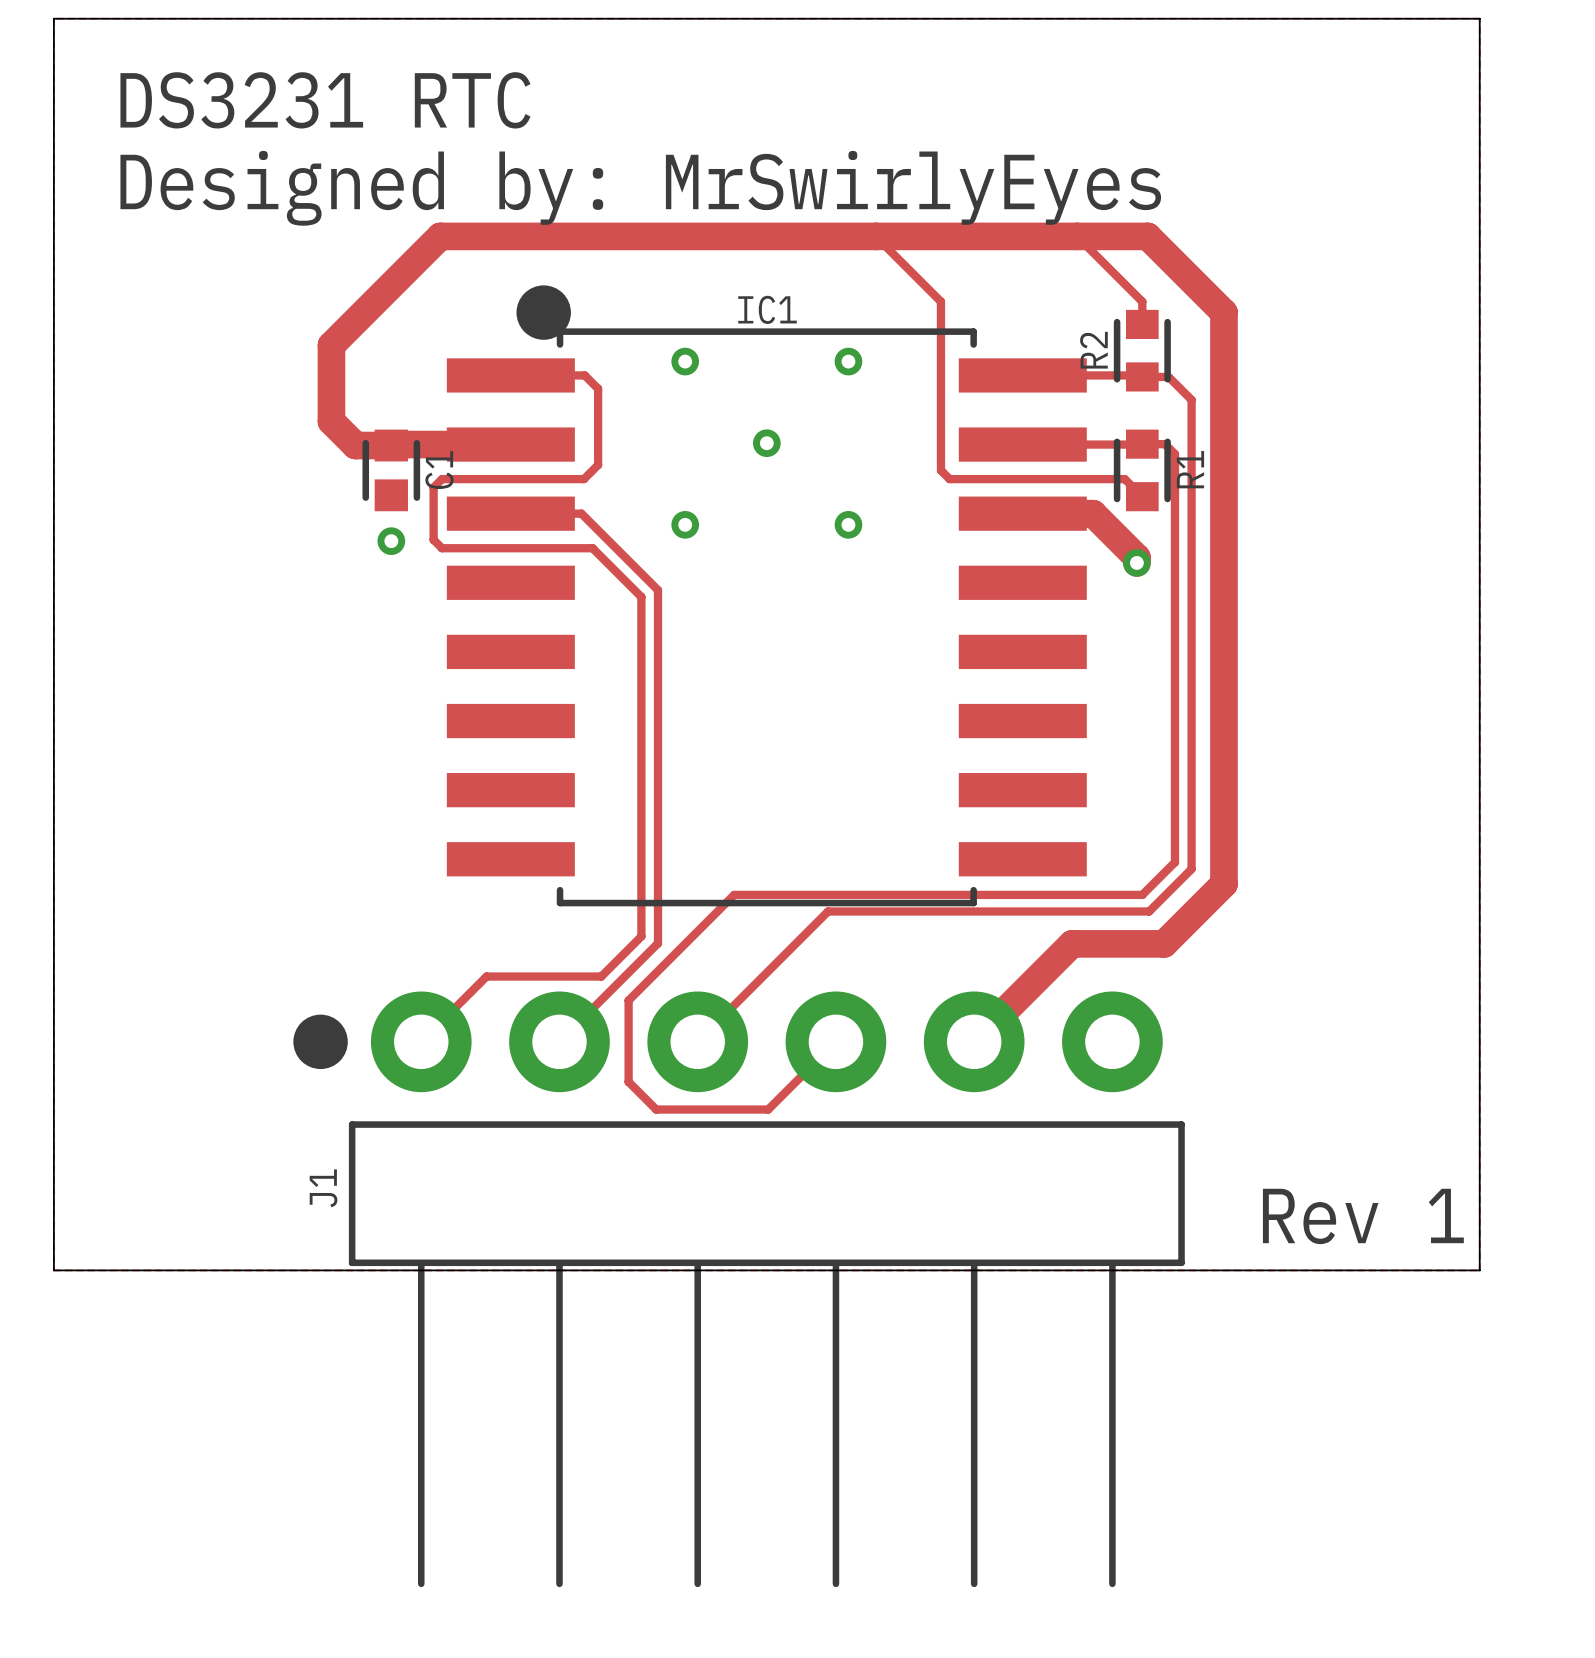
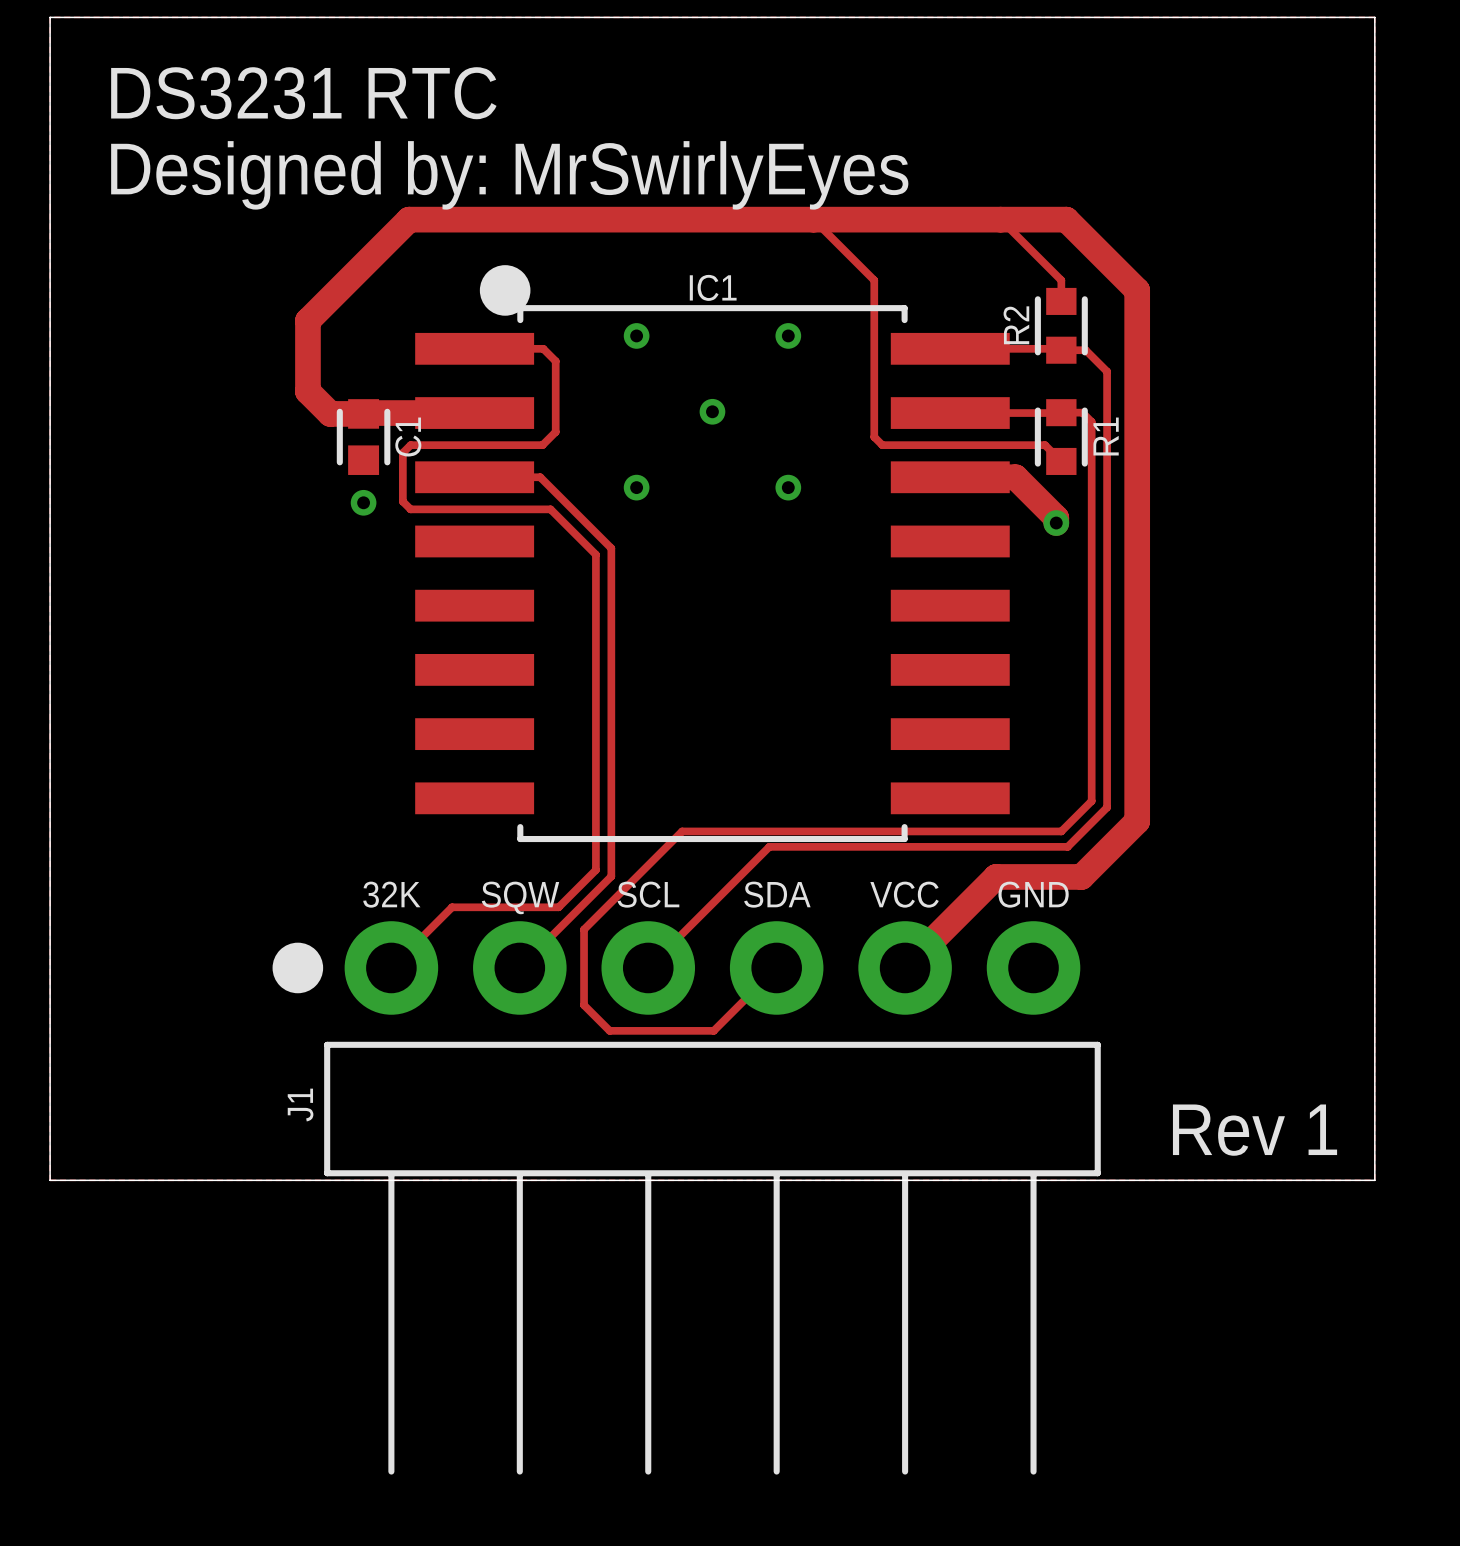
text: none -> 32K (391, 894)
text: none -> SCL (648, 894)
text: none -> SDA (777, 894)
text: none -> VCC (904, 894)
text: none -> GND (1033, 894)
text: none -> SQW (520, 897)

